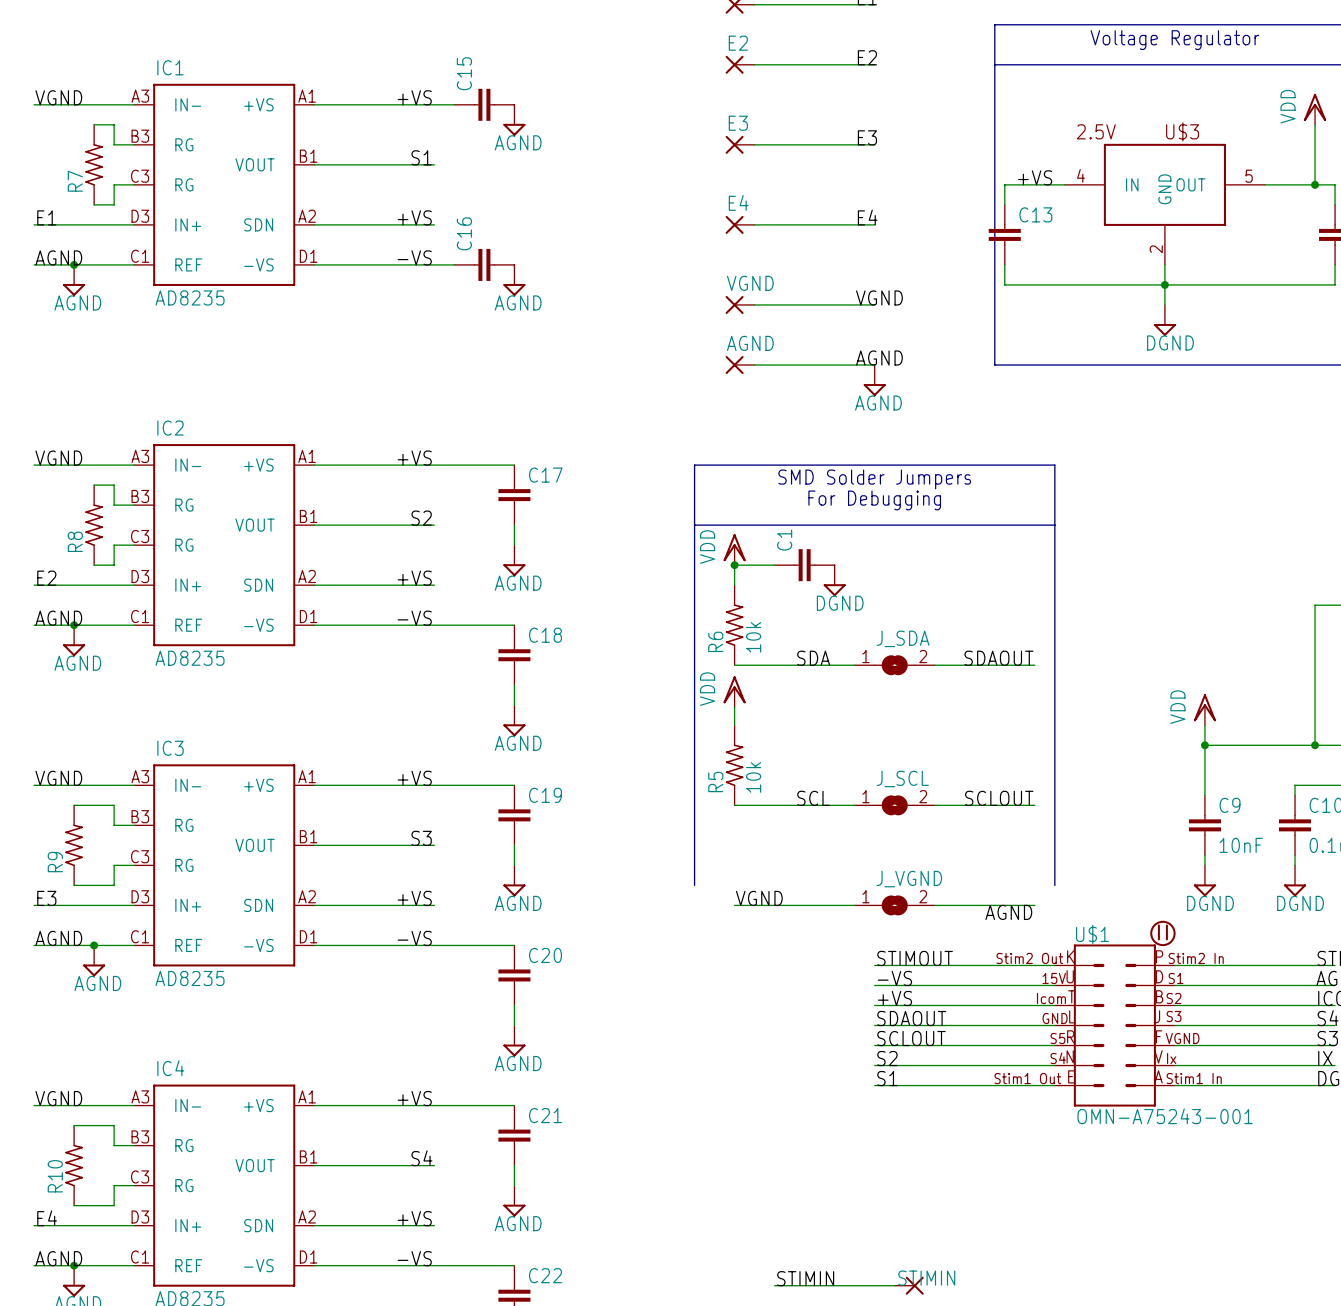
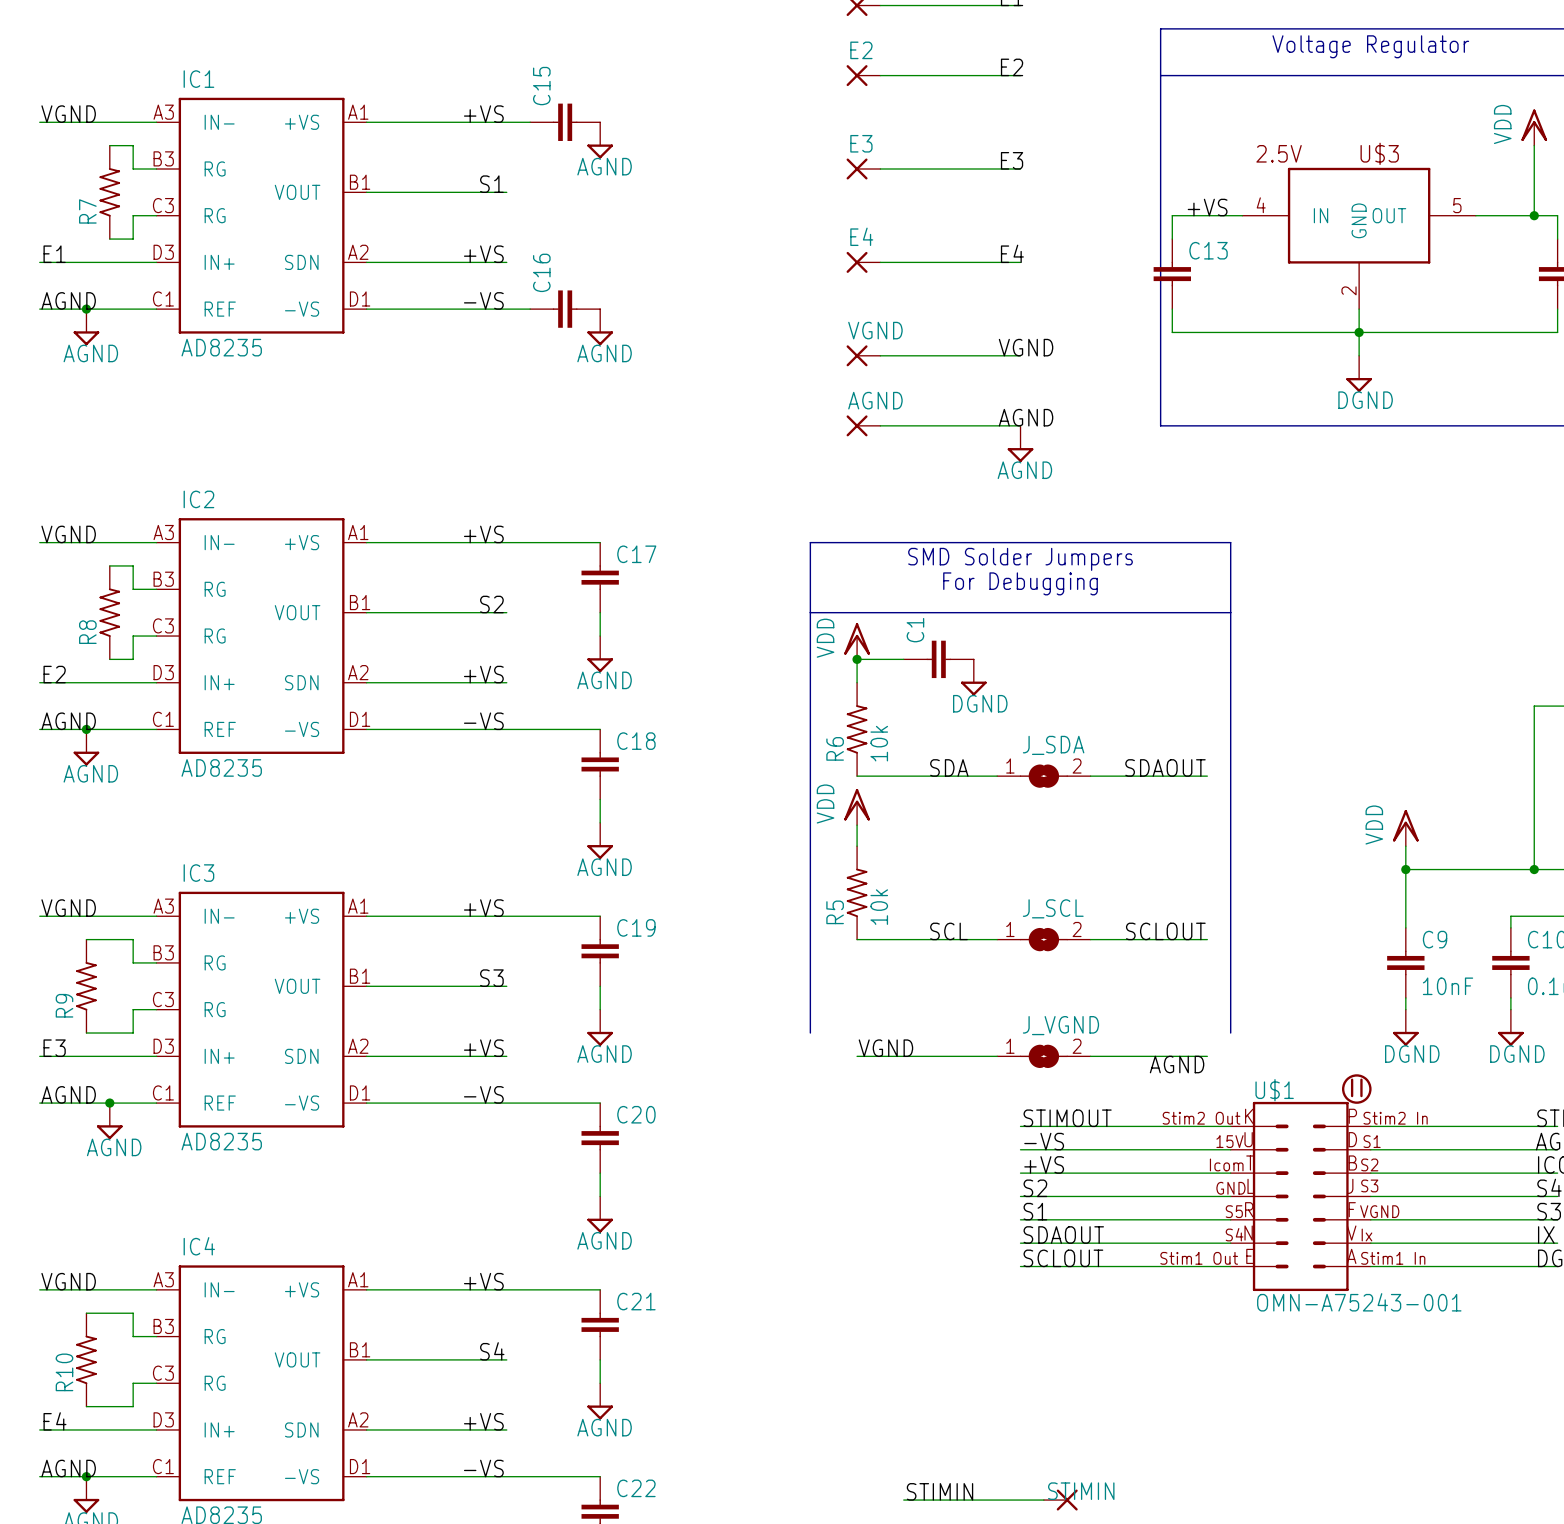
label: SDAOUT (911, 1018) -> S2 (1035, 1188)
label: SCLOUT (911, 1038) -> S1 (1035, 1211)
label: S2 (887, 1058) -> SDAOUT (1063, 1235)
label: S1 (887, 1078) -> SCLOUT (1063, 1258)

